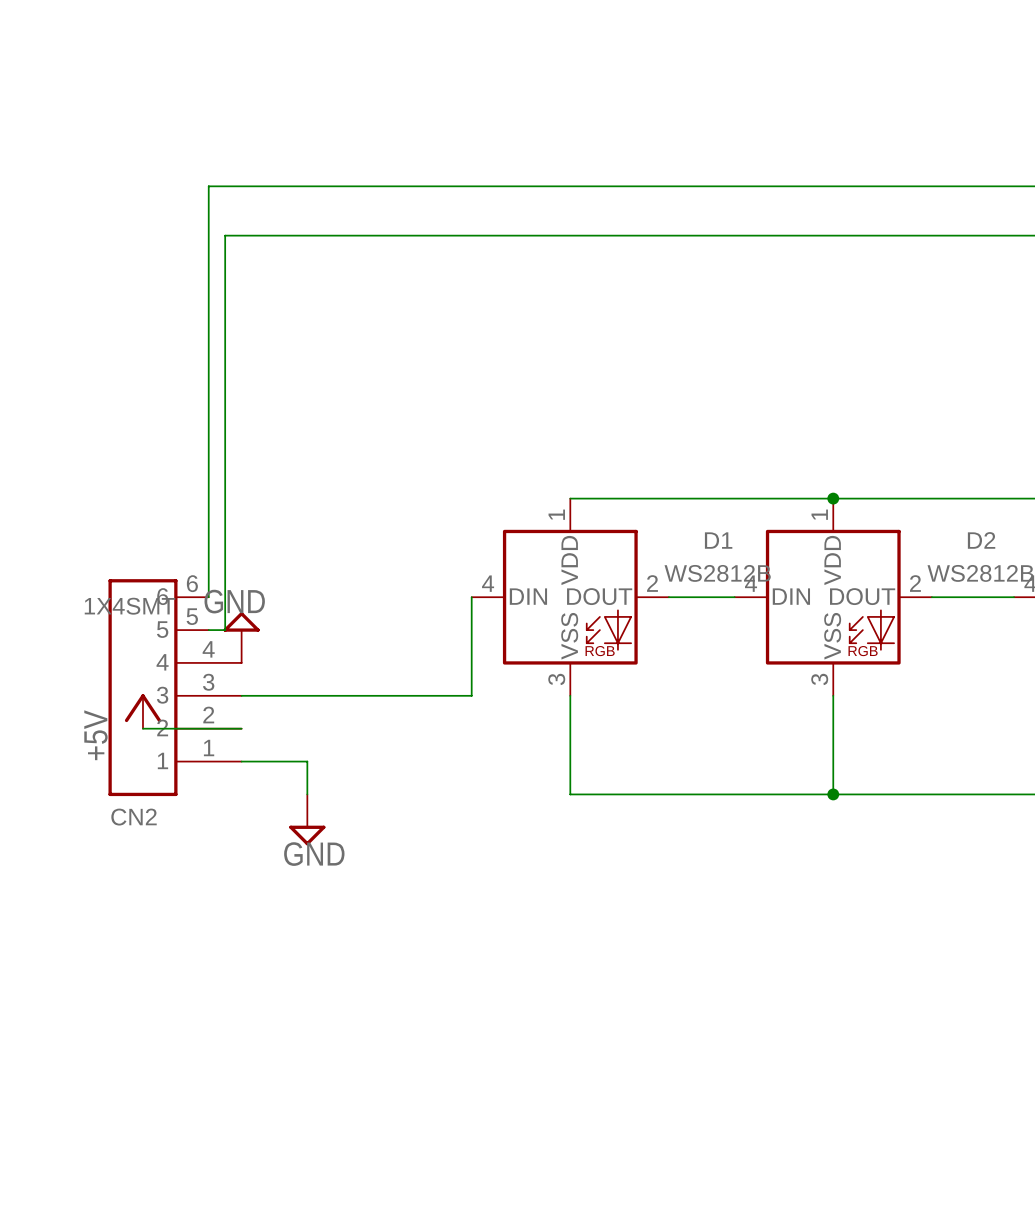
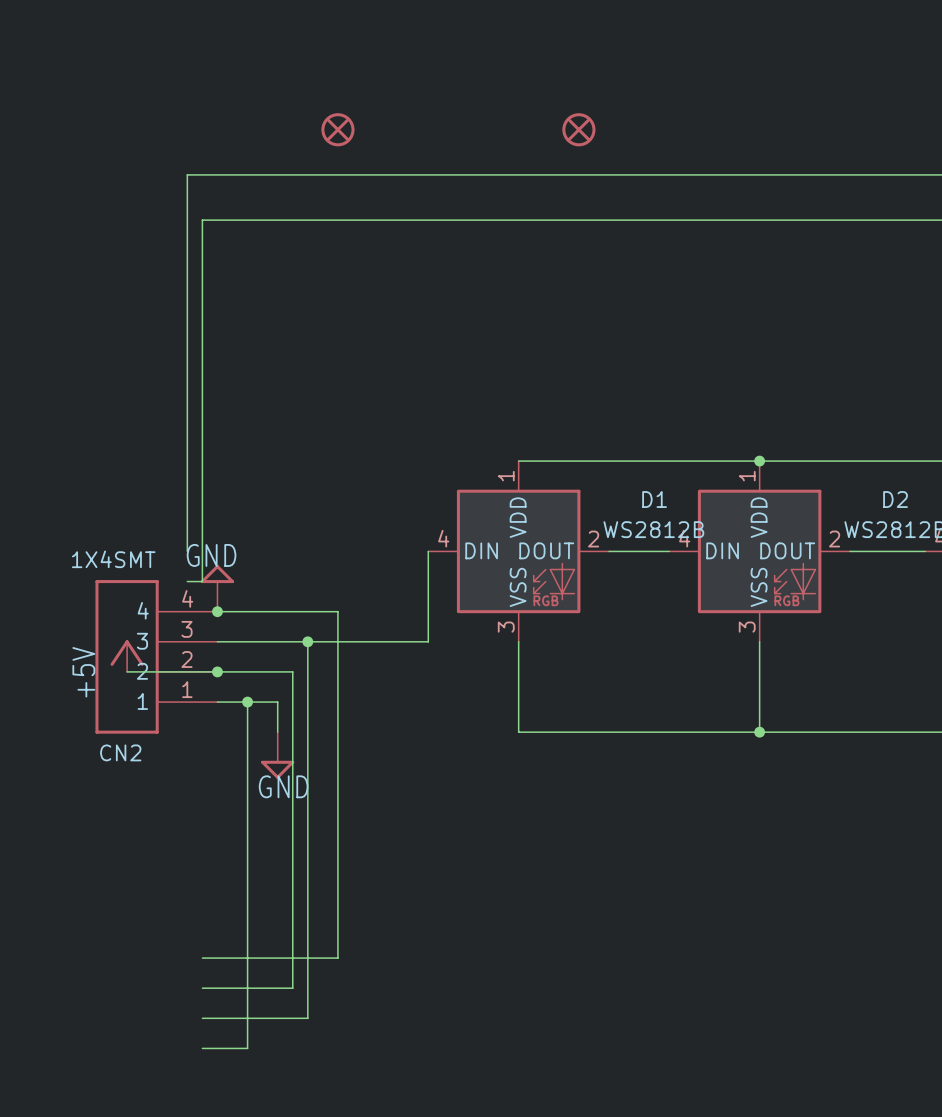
part: none -> (337, 129)
part: none -> (578, 129)
CN2 symbol: [108, 579, 242, 797] -> [95, 580, 218, 734]
wire: none -> (217, 611) (337, 611) (337, 958) (202, 958)
junction: none -> (217, 611)
wire: none -> (307, 641) (307, 1018) (202, 1018)
junction: none -> (307, 641)
wire: none -> (217, 671) (292, 671) (292, 988) (202, 988)
junction: none -> (217, 671)
wire: none -> (247, 702) (247, 1048) (202, 1048)
junction: none -> (247, 702)

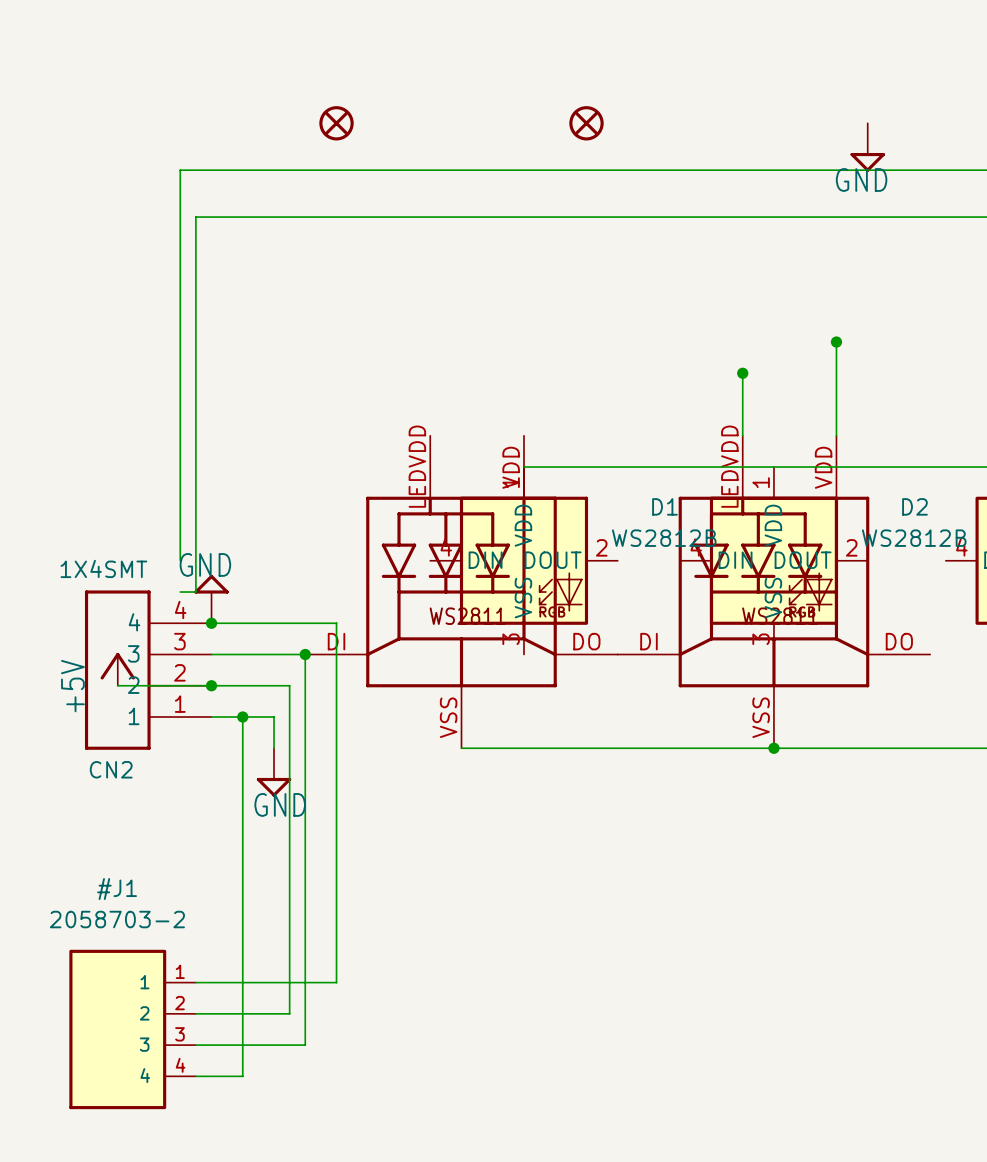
power symbol: none -> GND (867, 147)
wire: none -> (836, 342) (836, 435)
junction: none -> (836, 342)
wire: none -> (742, 373) (742, 435)
junction: none -> (742, 373)
junction: (759, 461) -> none
wire: (428, 551) (428, 641) (307, 641) -> none
wire: (609, 551) (669, 551) -> none
wire: (849, 551) (925, 551) -> none
part: none -> (461, 592)
part: none -> (773, 592)
wire: (518, 641) (518, 732) -> (461, 748) (523, 748)
#J1: none -> 2058703-2 (132, 1029)

